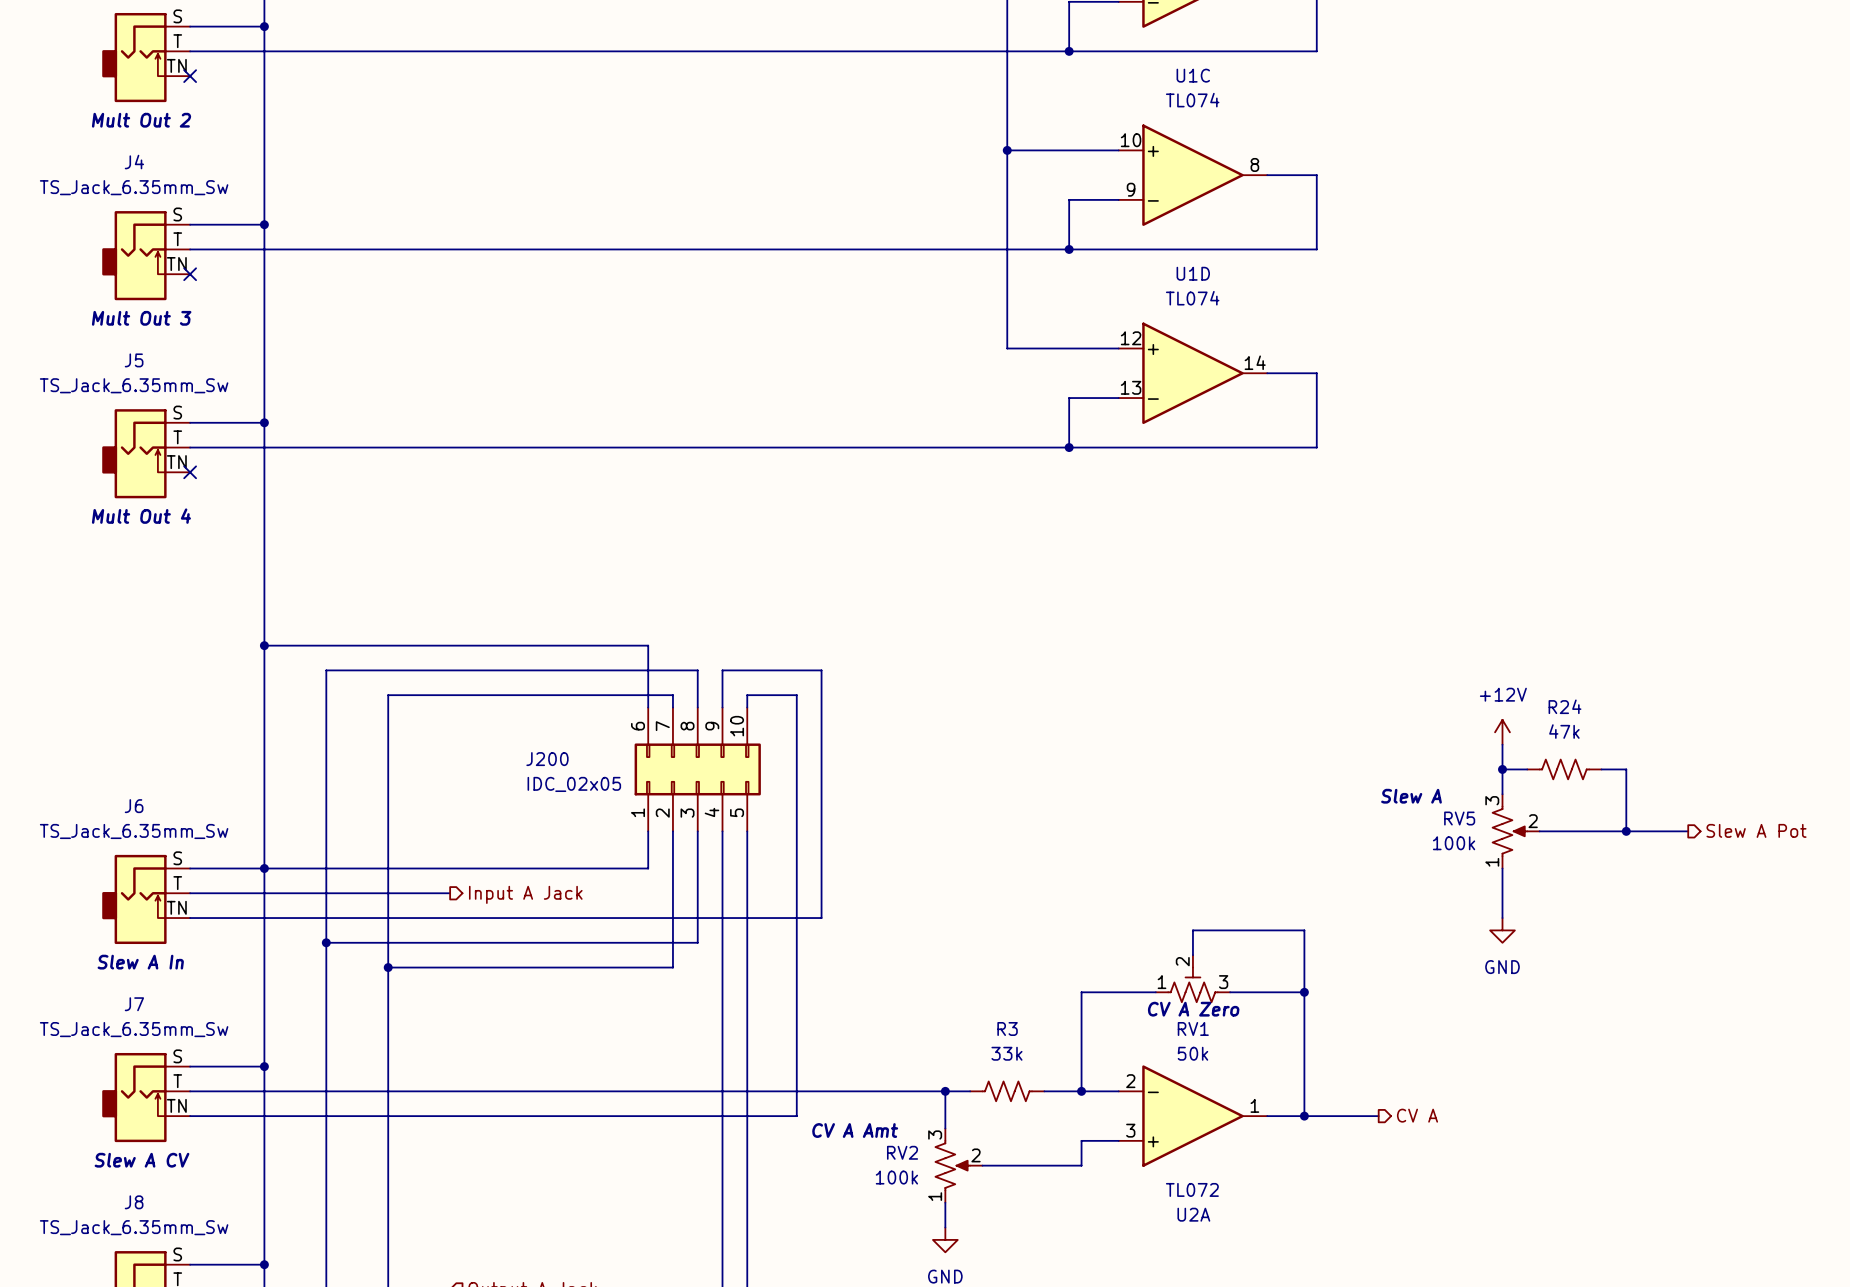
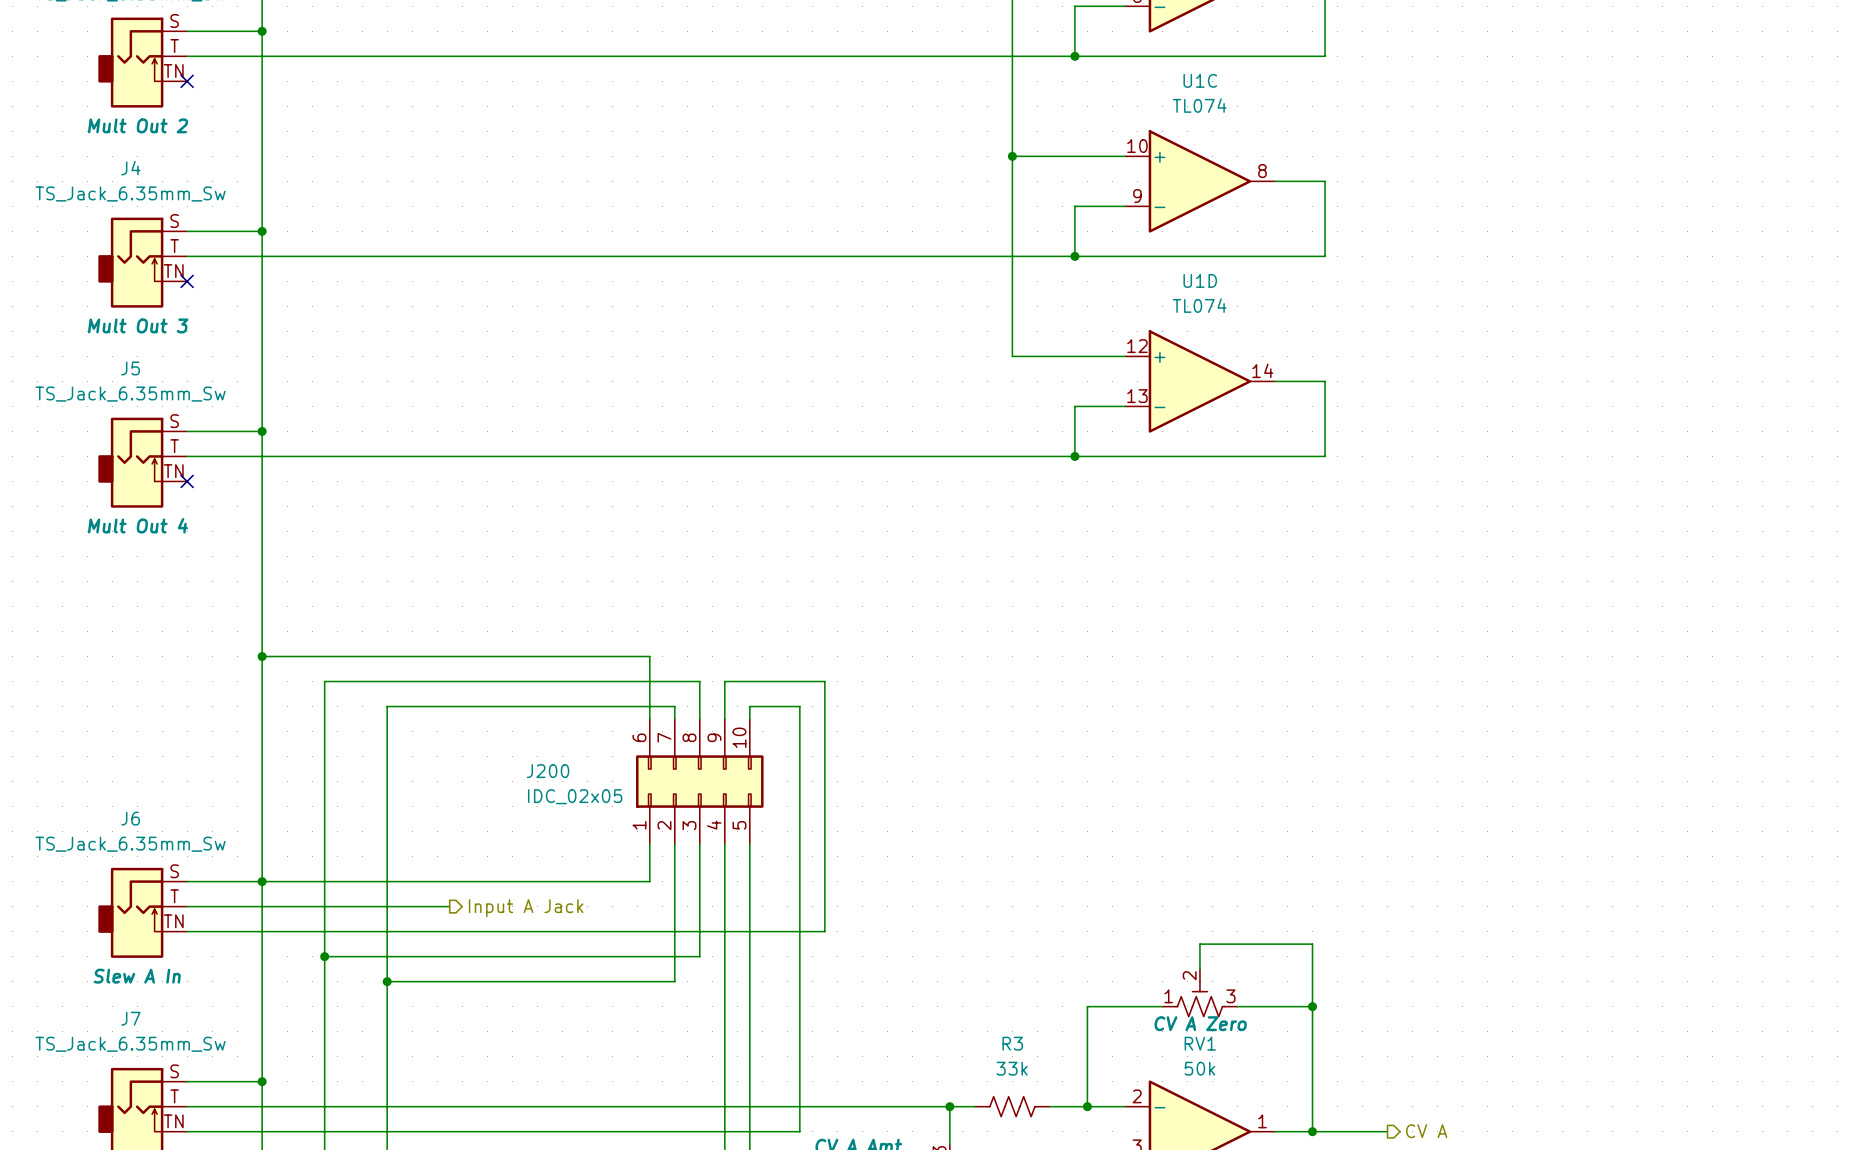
power symbol: +12V (1502, 732) -> none
wire: (1502, 744) (1502, 794) -> none
wire: (1502, 769) (1527, 769) -> none
junction: (1502, 769) -> none
R24: 47k (1564, 769) -> none
wire: (1601, 769) (1626, 769) (1626, 831) -> none
hierarchical label: Slew A Pot (1756, 830) -> none
RV5: 100k (1516, 831) -> none
wire: (1539, 831) (1688, 831) -> none
junction: (1626, 831) -> none
wire: (1502, 868) (1502, 918) -> none
power symbol: GND (1502, 930) -> none

